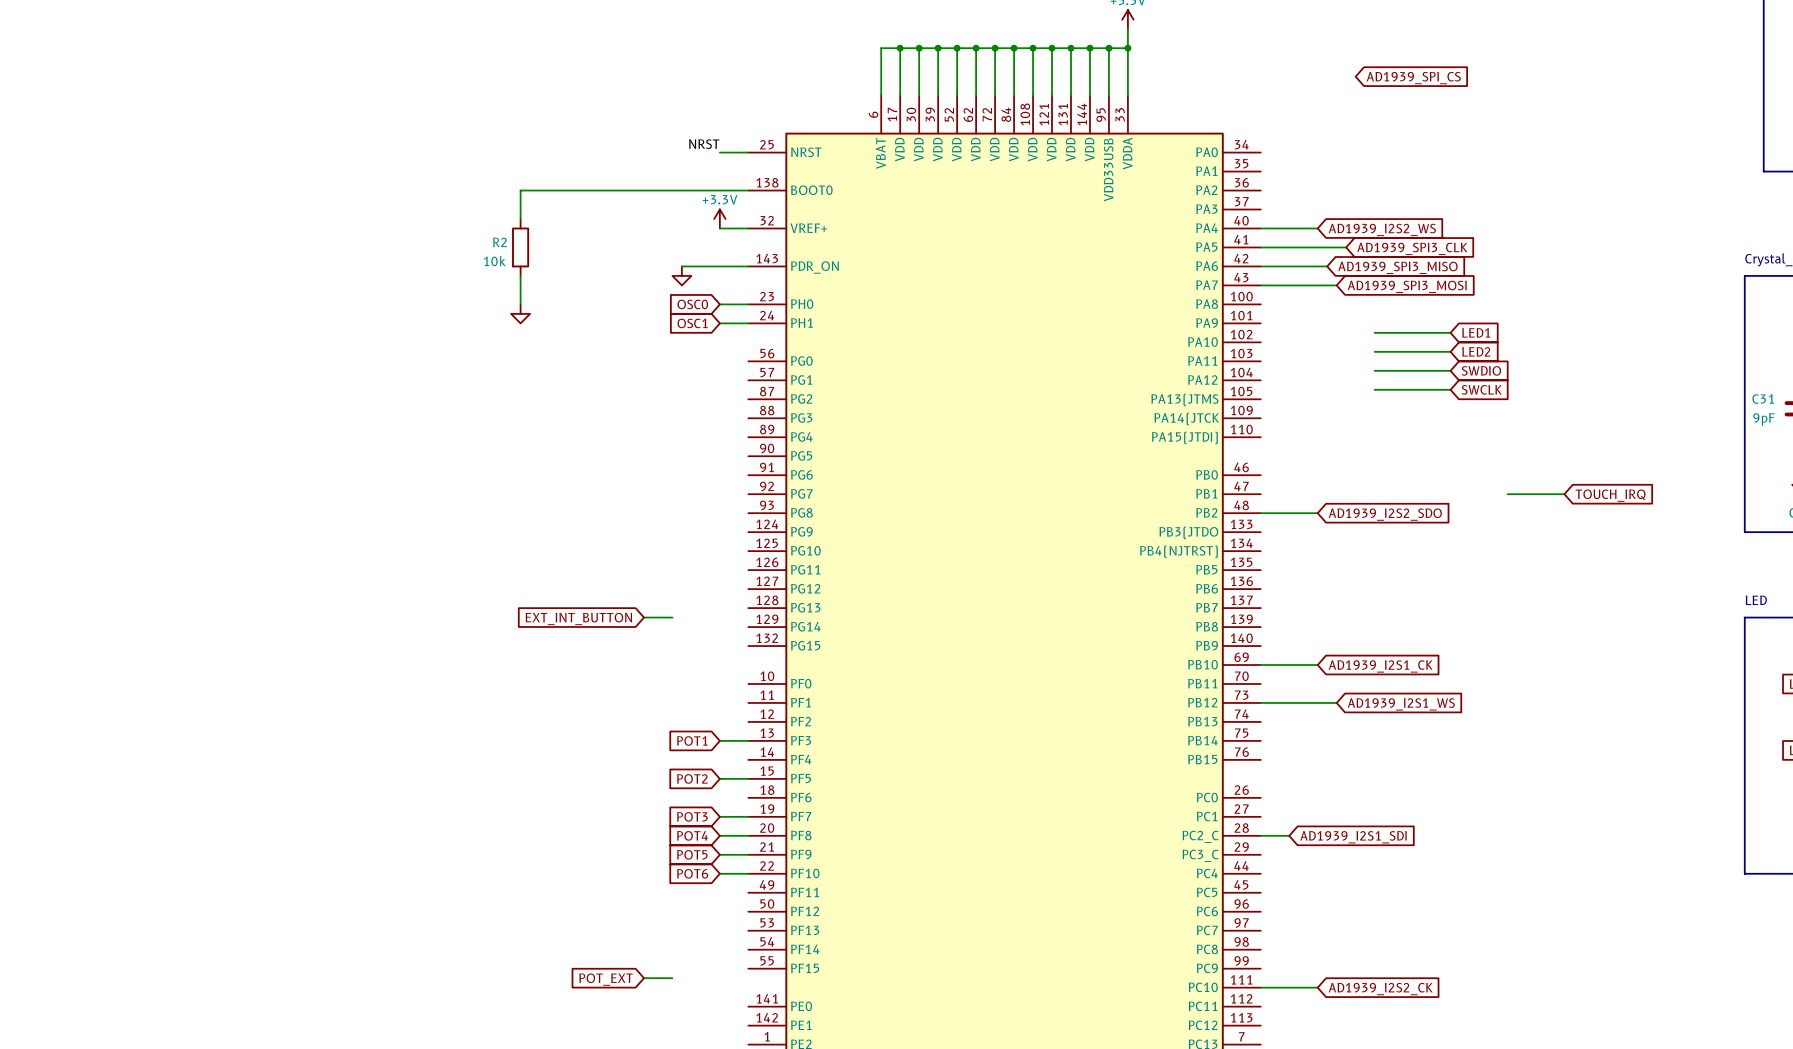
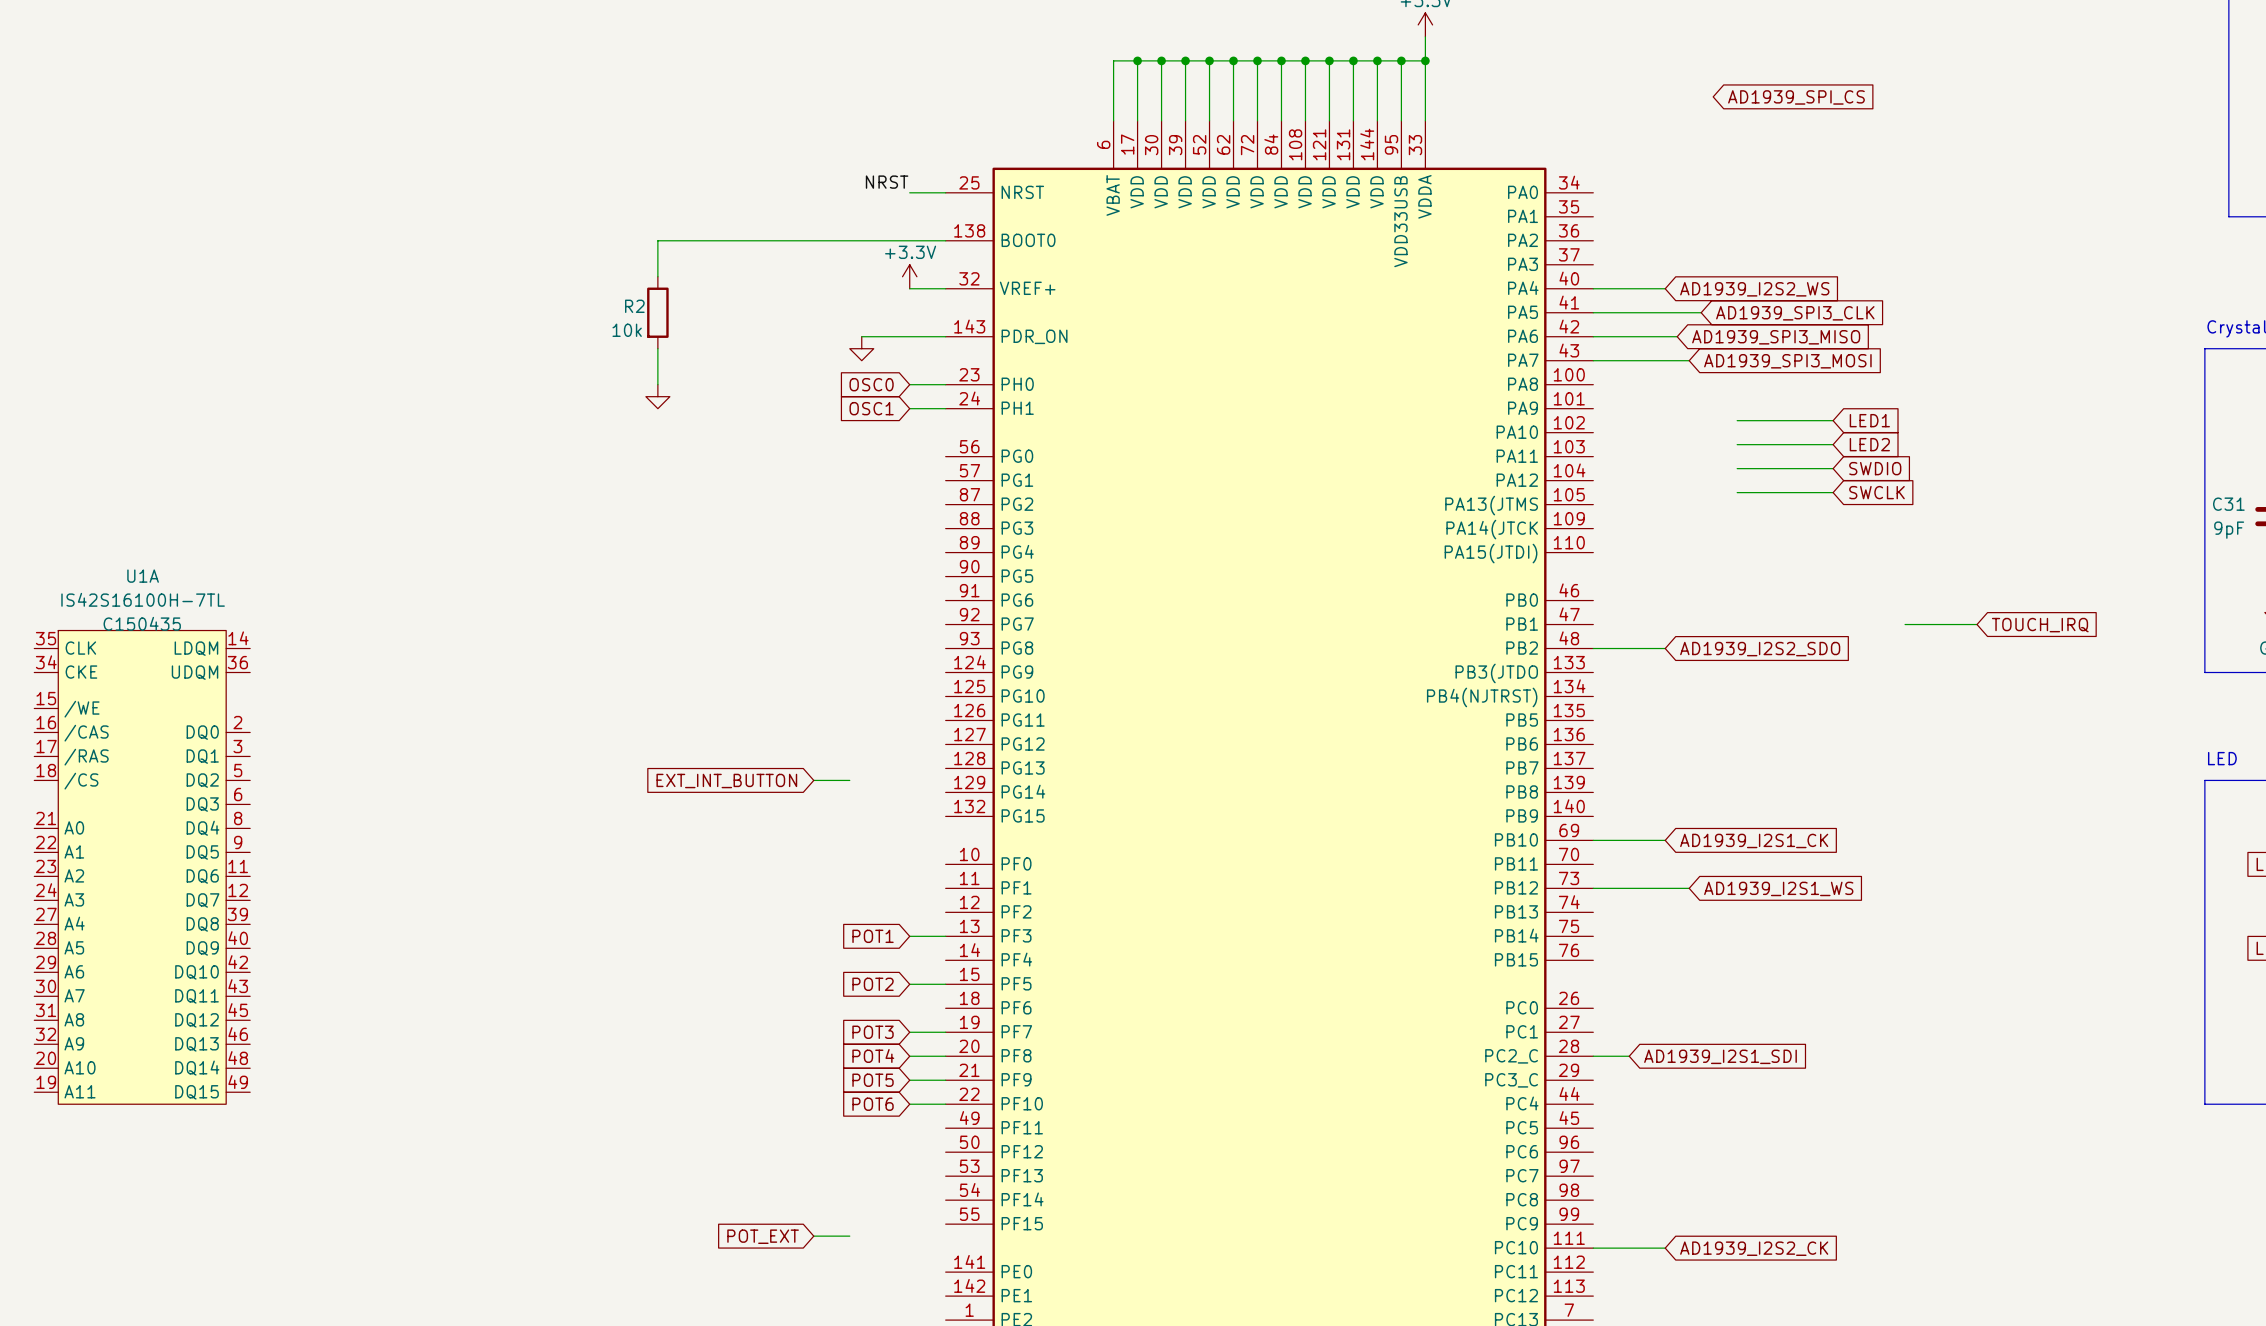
U1A: none -> IS42S16100H-7TL (142, 867)

